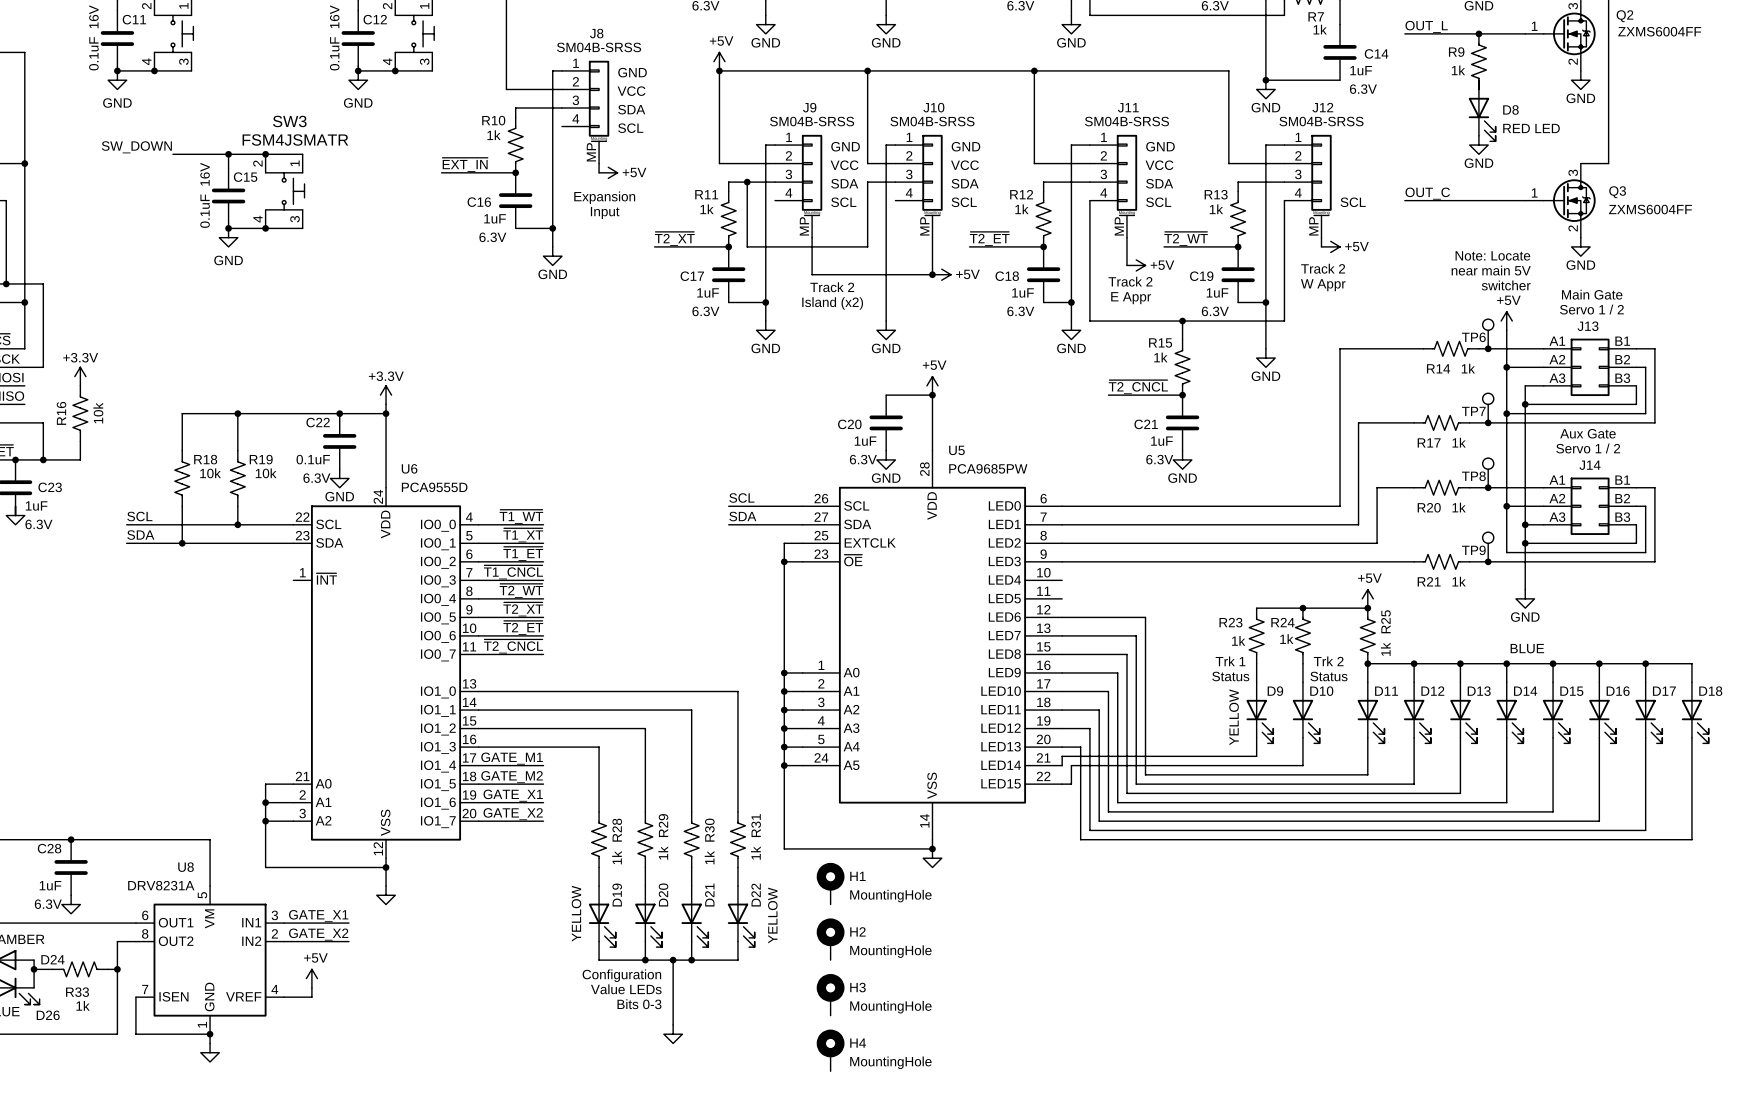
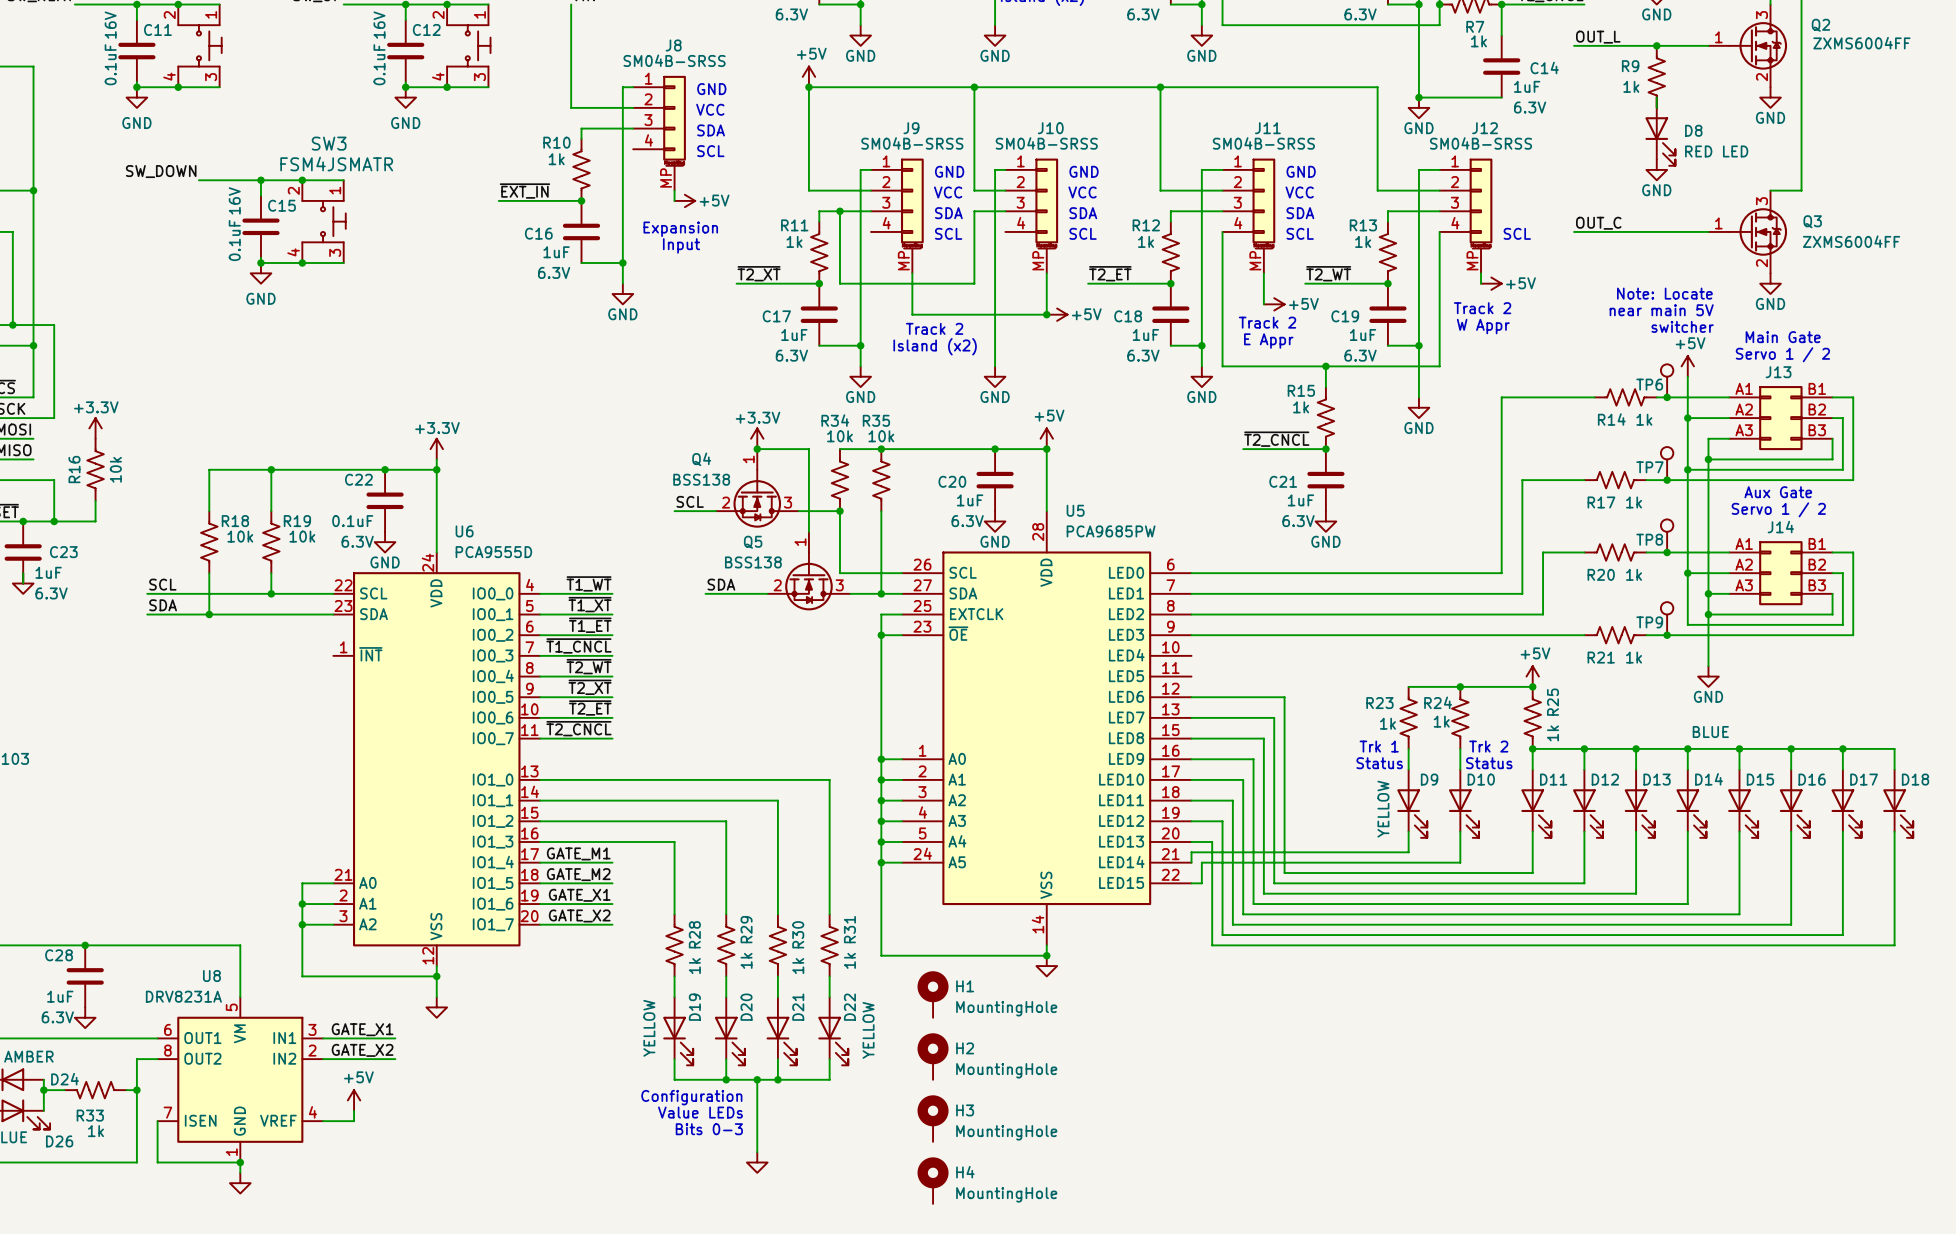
power symbol: none -> +3.3V (757, 438)
wire: none -> (757, 449) (808, 449) (808, 531)
junction: none -> (757, 449)
wire: none -> (839, 449) (995, 449)
junction: none -> (881, 449)
junction: none -> (995, 449)
R34: none -> 10k (839, 480)
R35: none -> 10k (881, 480)
Q4: none -> BSS138 (757, 488)
wire: none -> (674, 511) (715, 511)
junction: none -> (839, 511)
wire: none -> (881, 511) (881, 593)
label position: SCL (741, 497) -> SCL (690, 501)
Q5: none -> BSS138 (808, 571)
wire: (728, 506) (747, 506) -> (798, 511) (839, 511) (839, 573)
label position: SDA (742, 516) -> SDA (721, 584)
wire: none -> (705, 593) (767, 593)
junction: none -> (881, 593)

